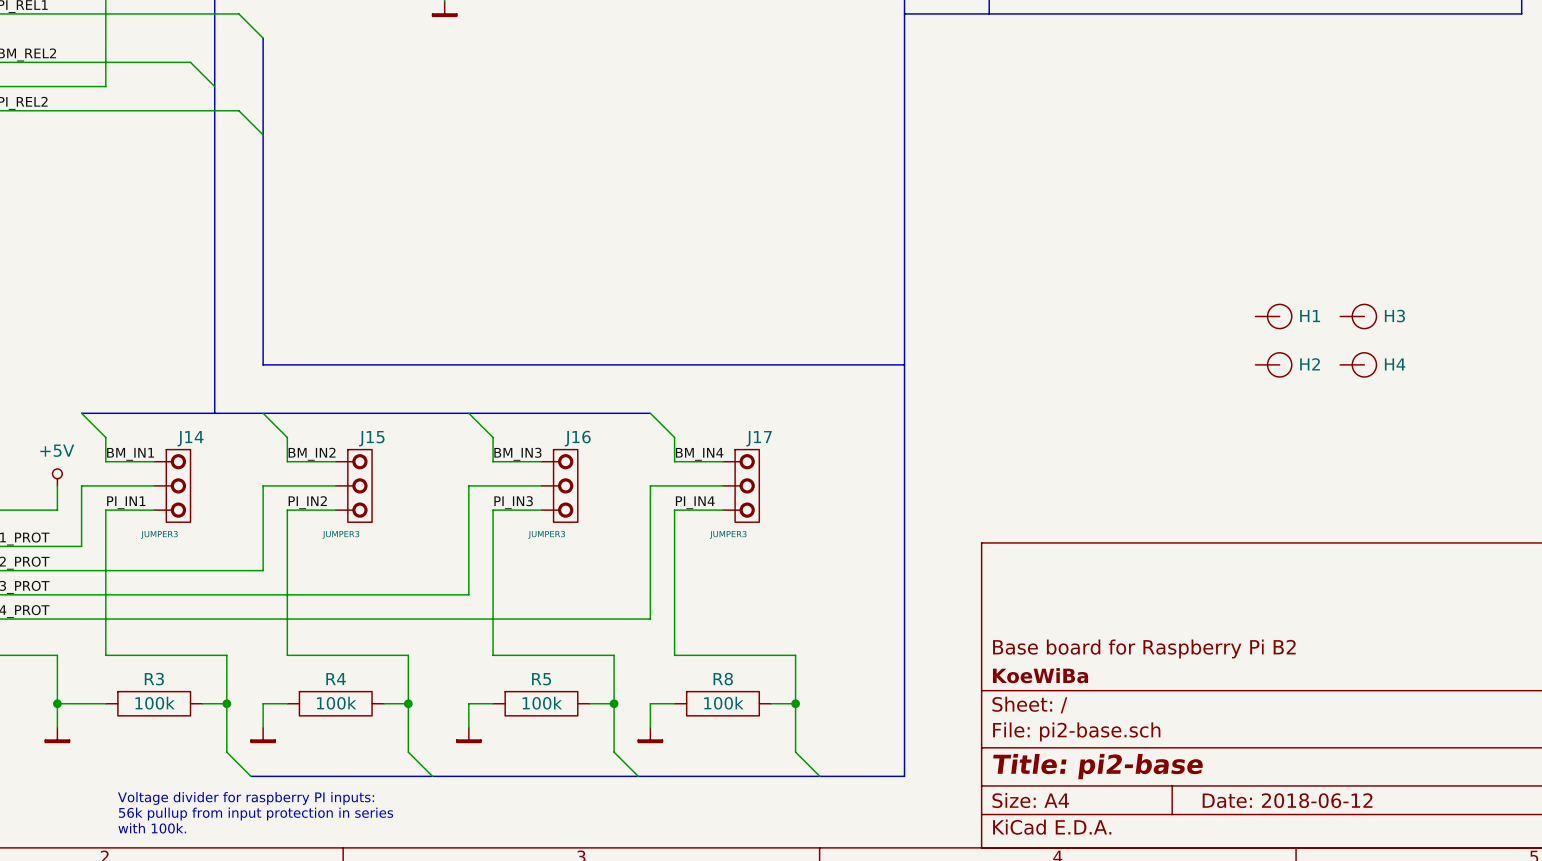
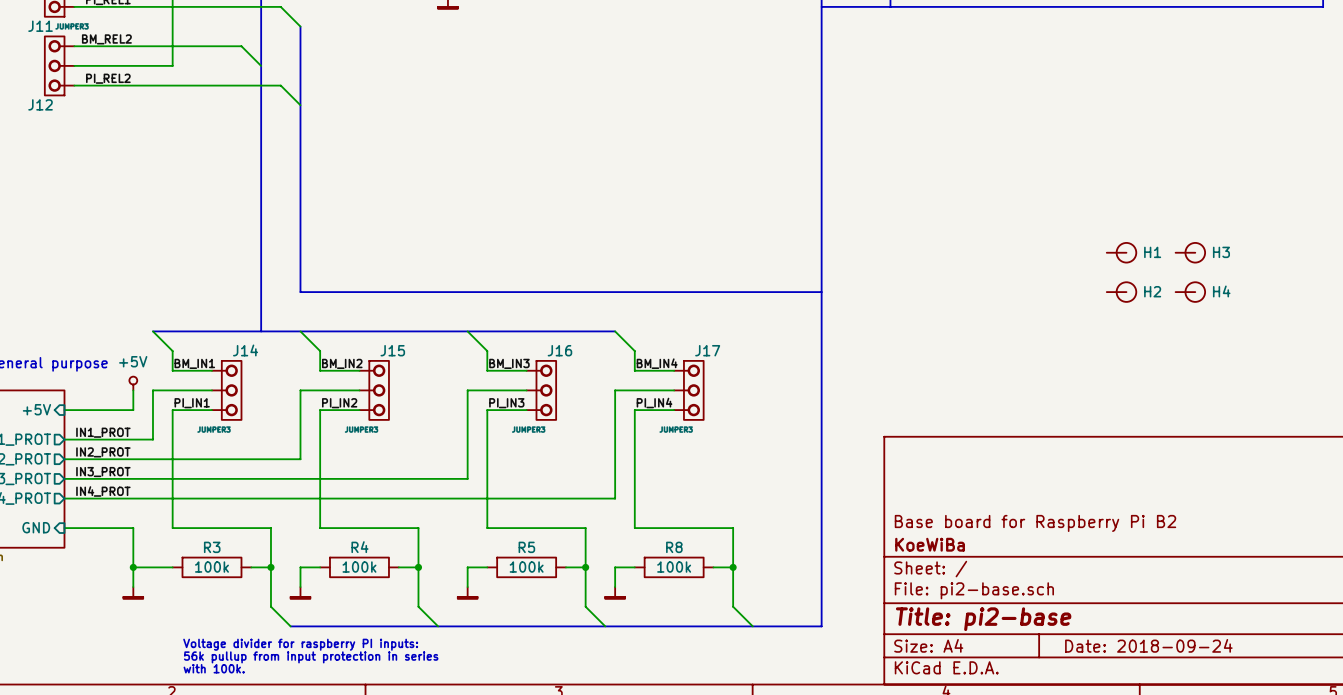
title block: Date: 2018-06-12 (1287, 800) -> Date: 2018-09-24 (1148, 645)

